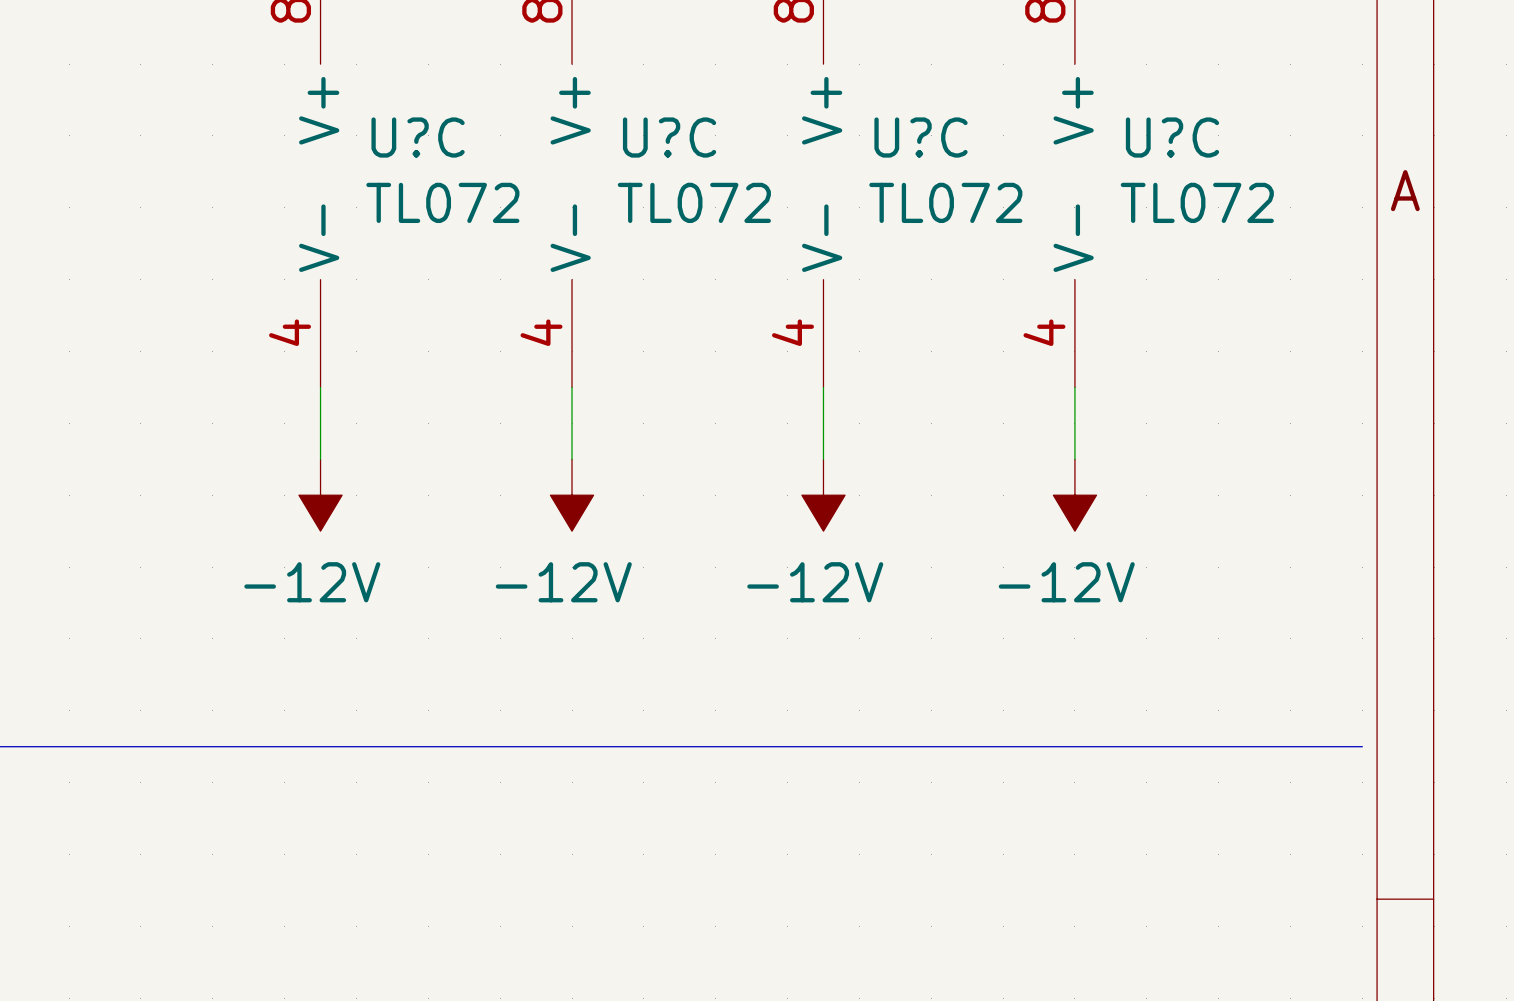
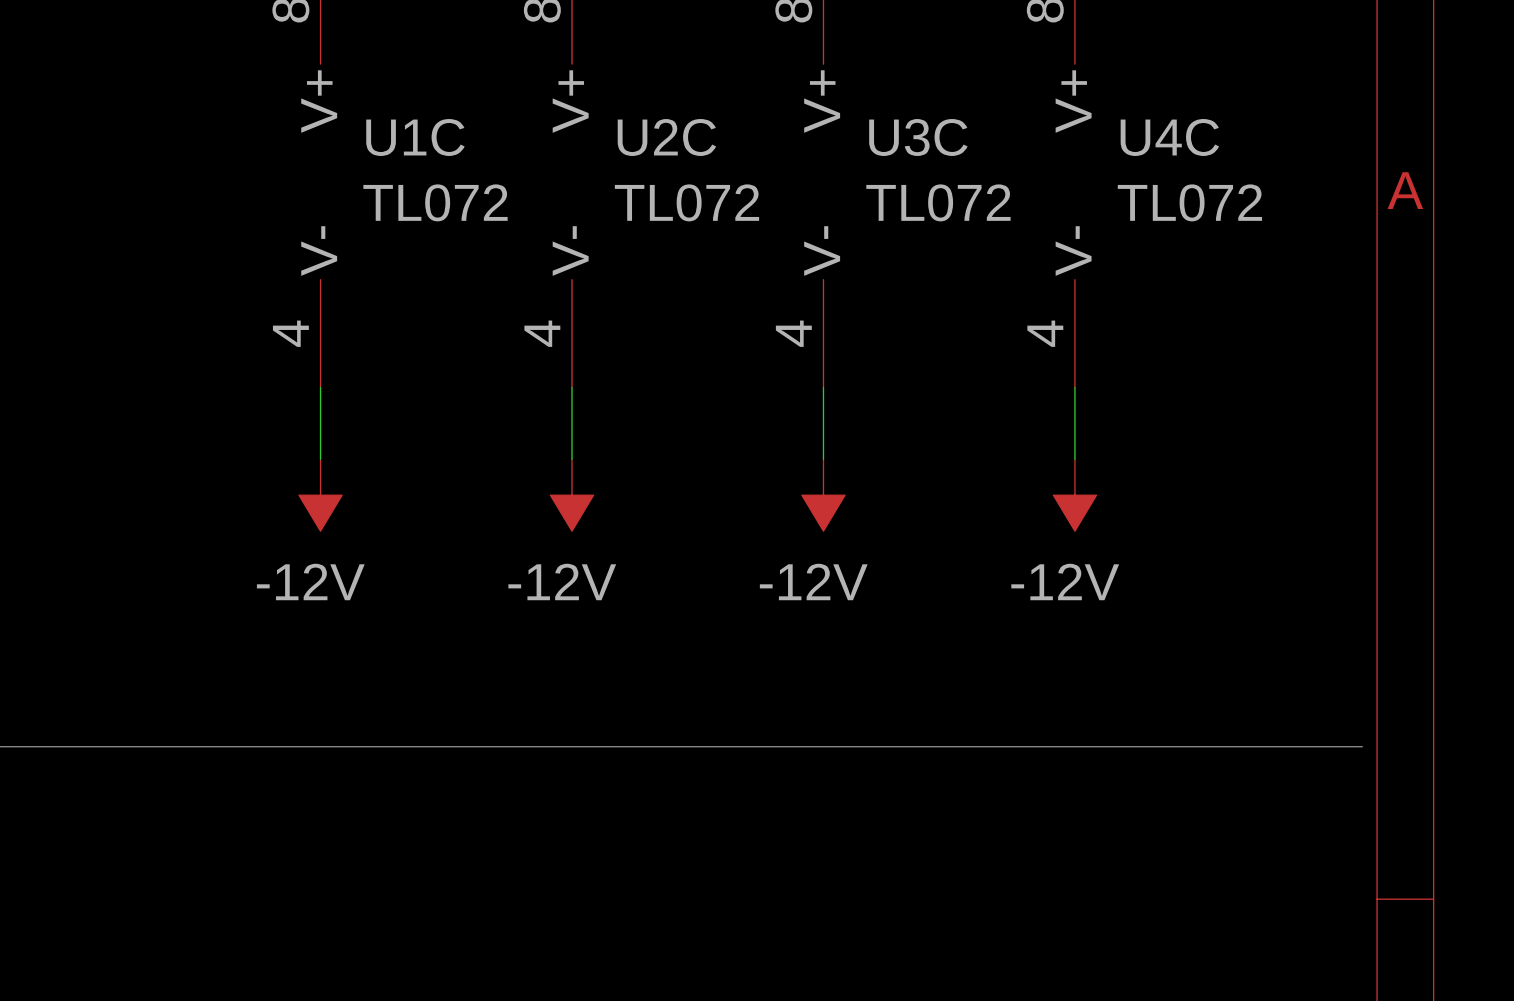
U?C name: U?C (418, 137) -> U1C (415, 137)
U?C name: U?C (669, 137) -> U2C (666, 137)
U?C name: U?C (921, 137) -> U3C (918, 137)
U?C name: U?C (1172, 137) -> U4C (1169, 137)

